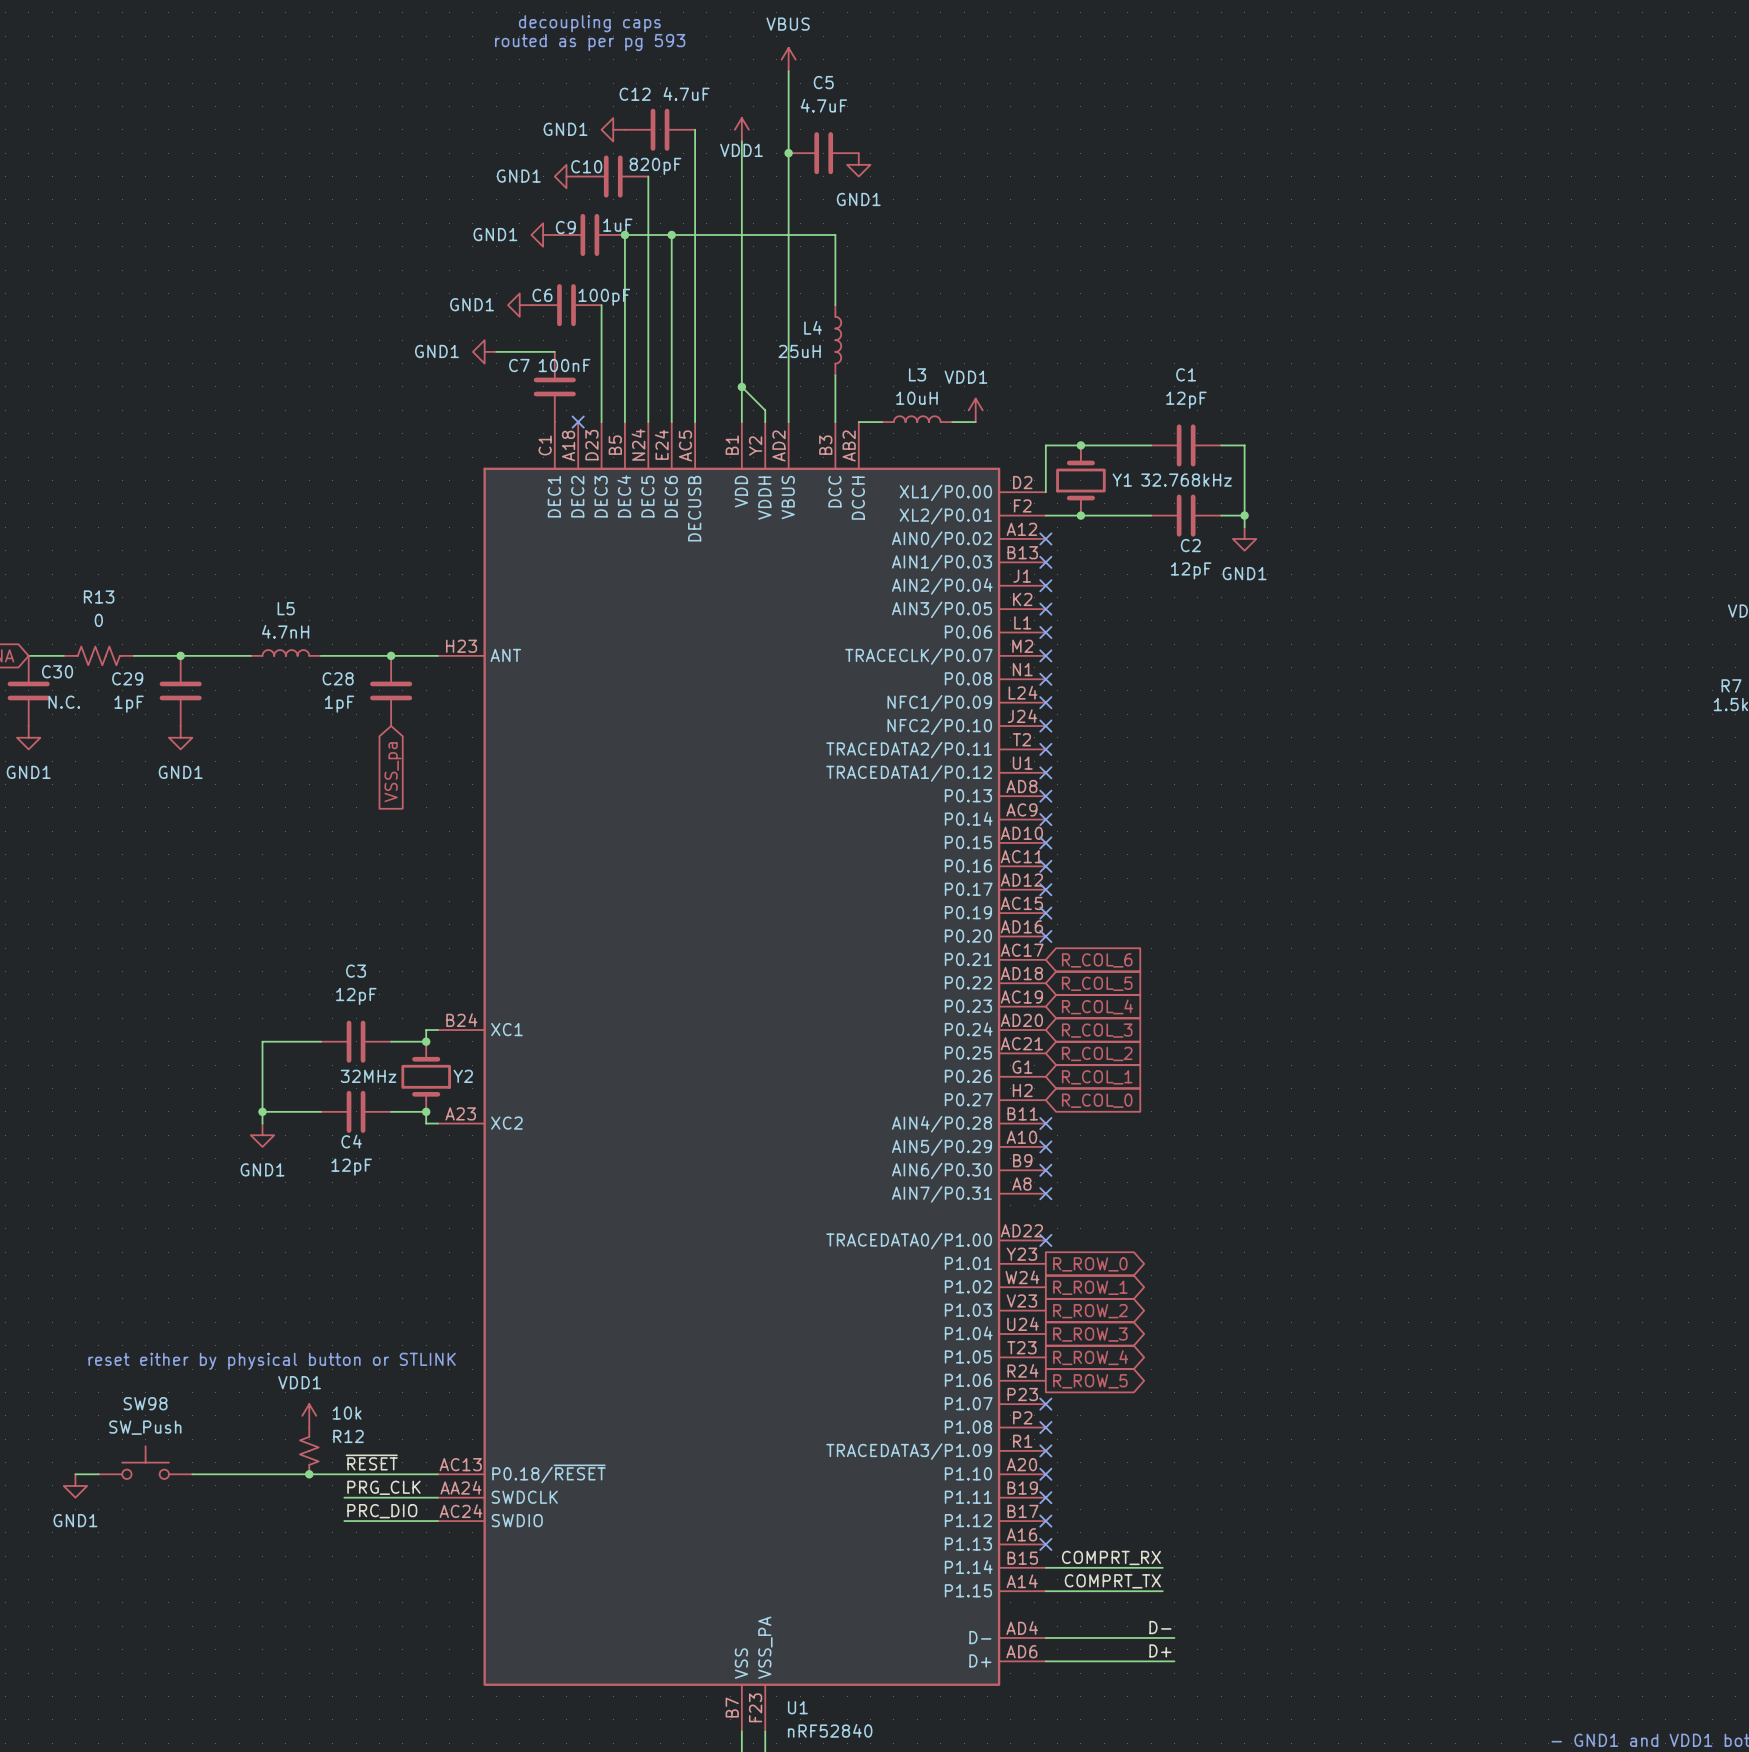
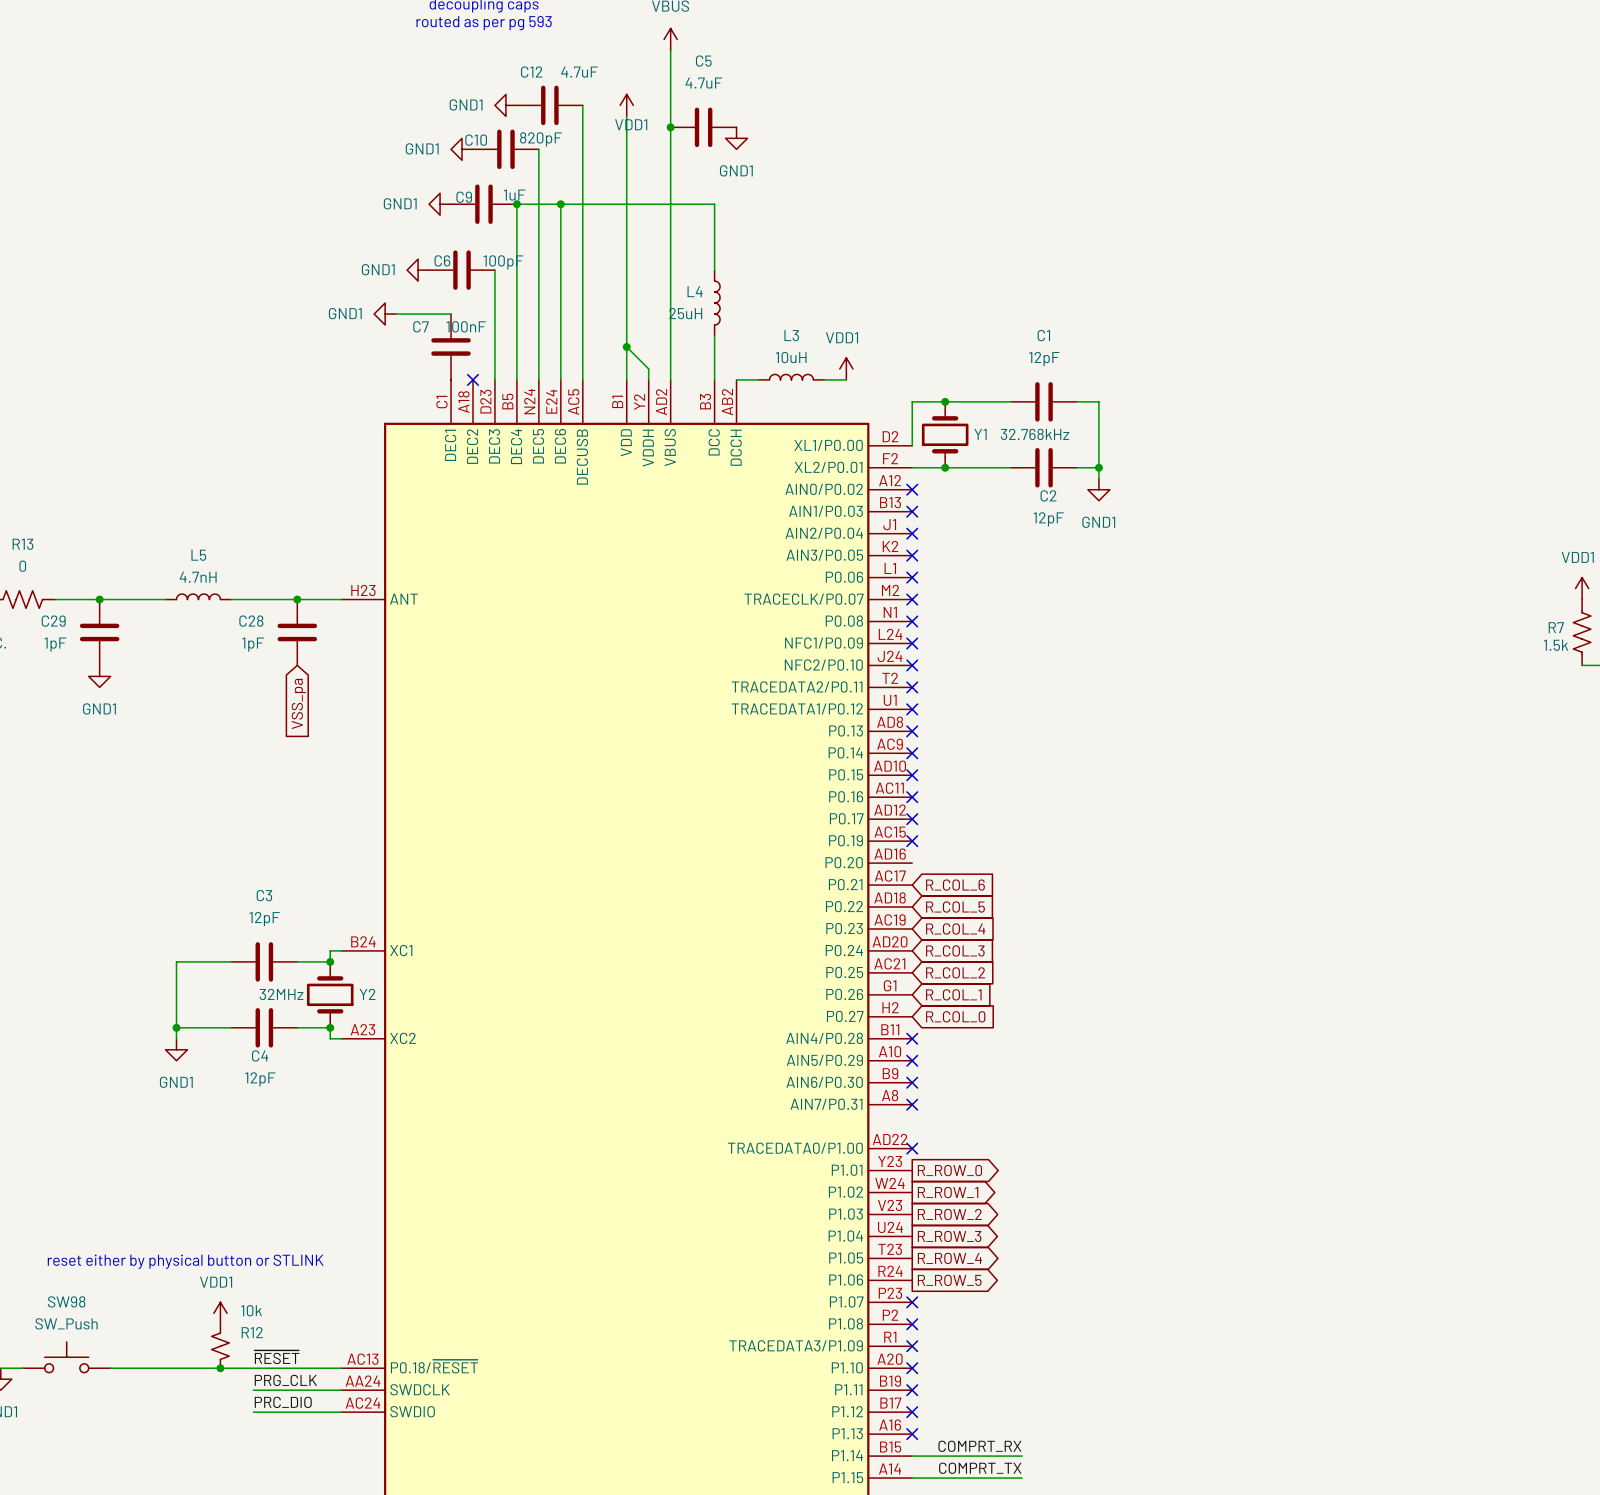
no-connect mark: (1045, 936) -> none

